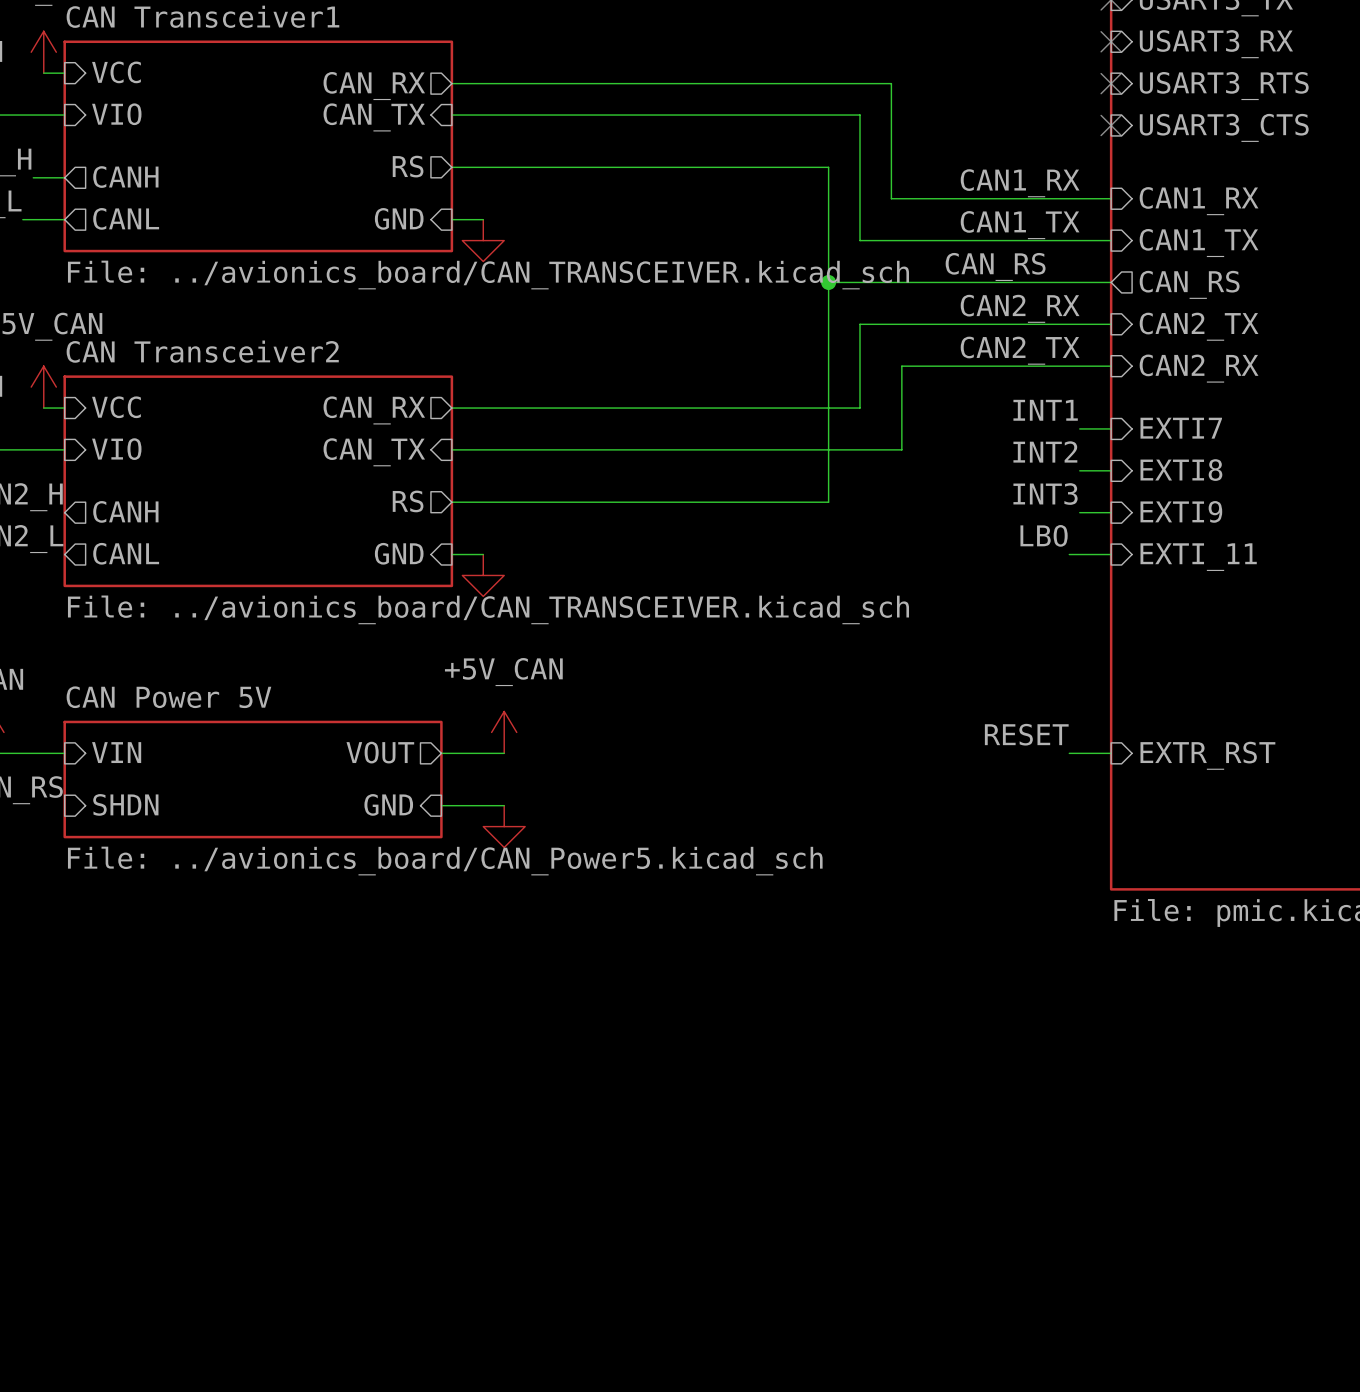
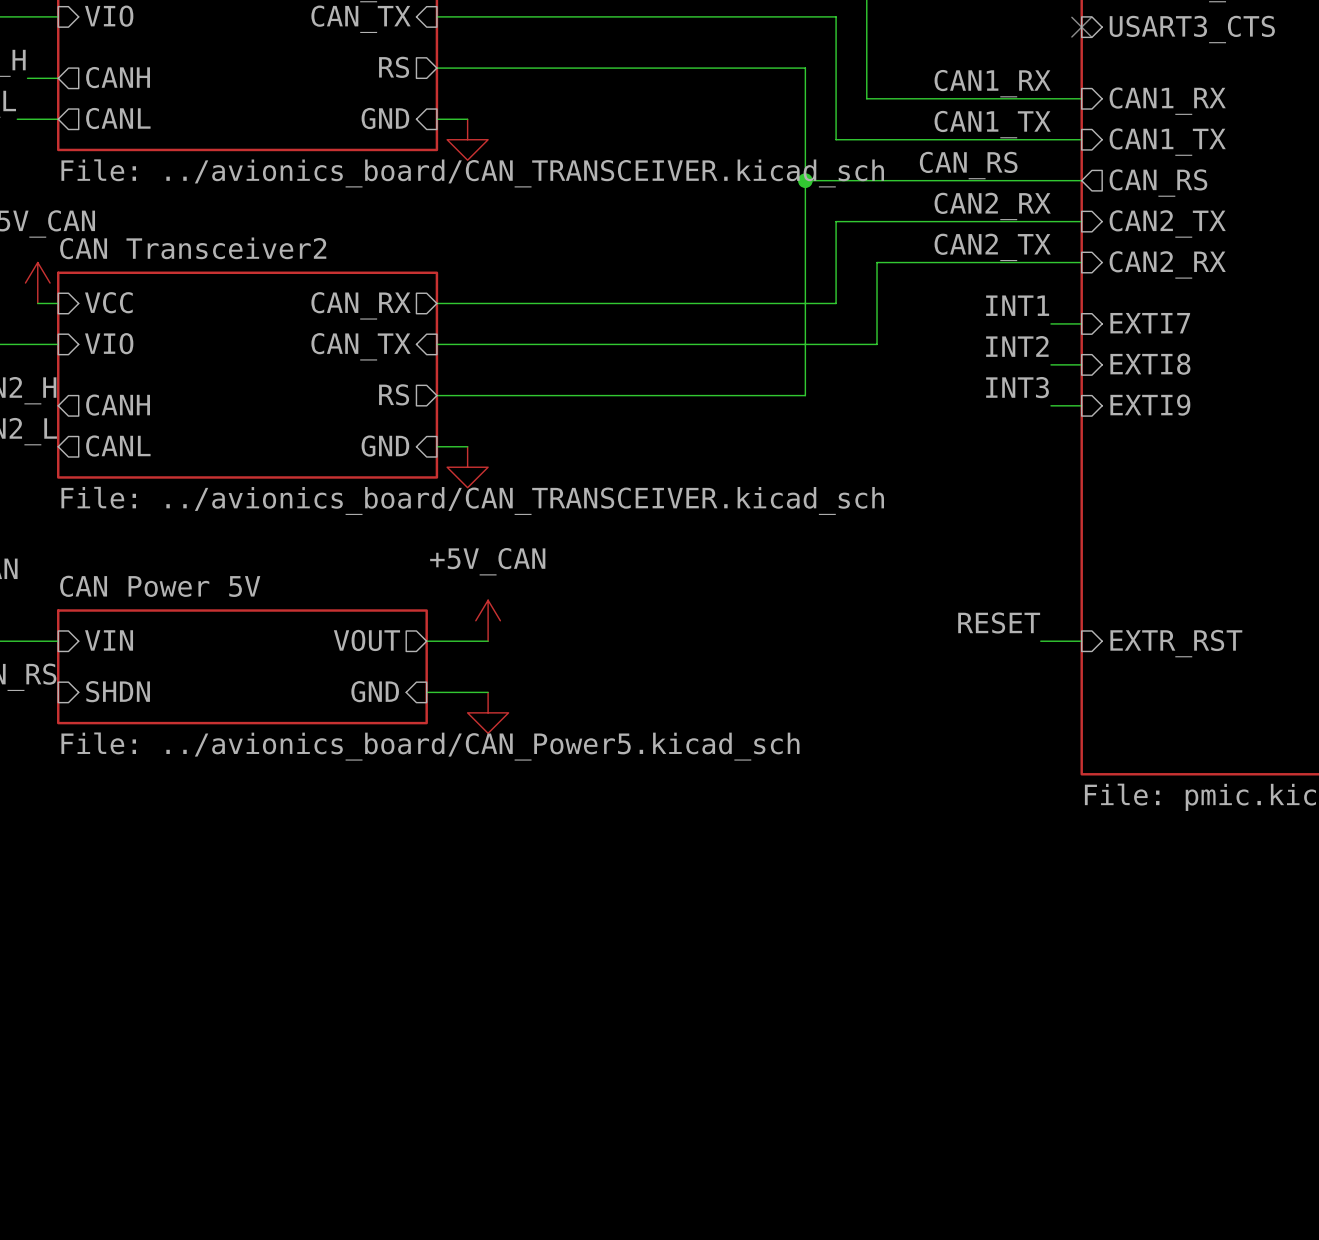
label: LBO (1044, 535) -> none
wire: (1069, 554) (1111, 554) -> none
sheet pin: EXTI_11 (1198, 557) -> none

